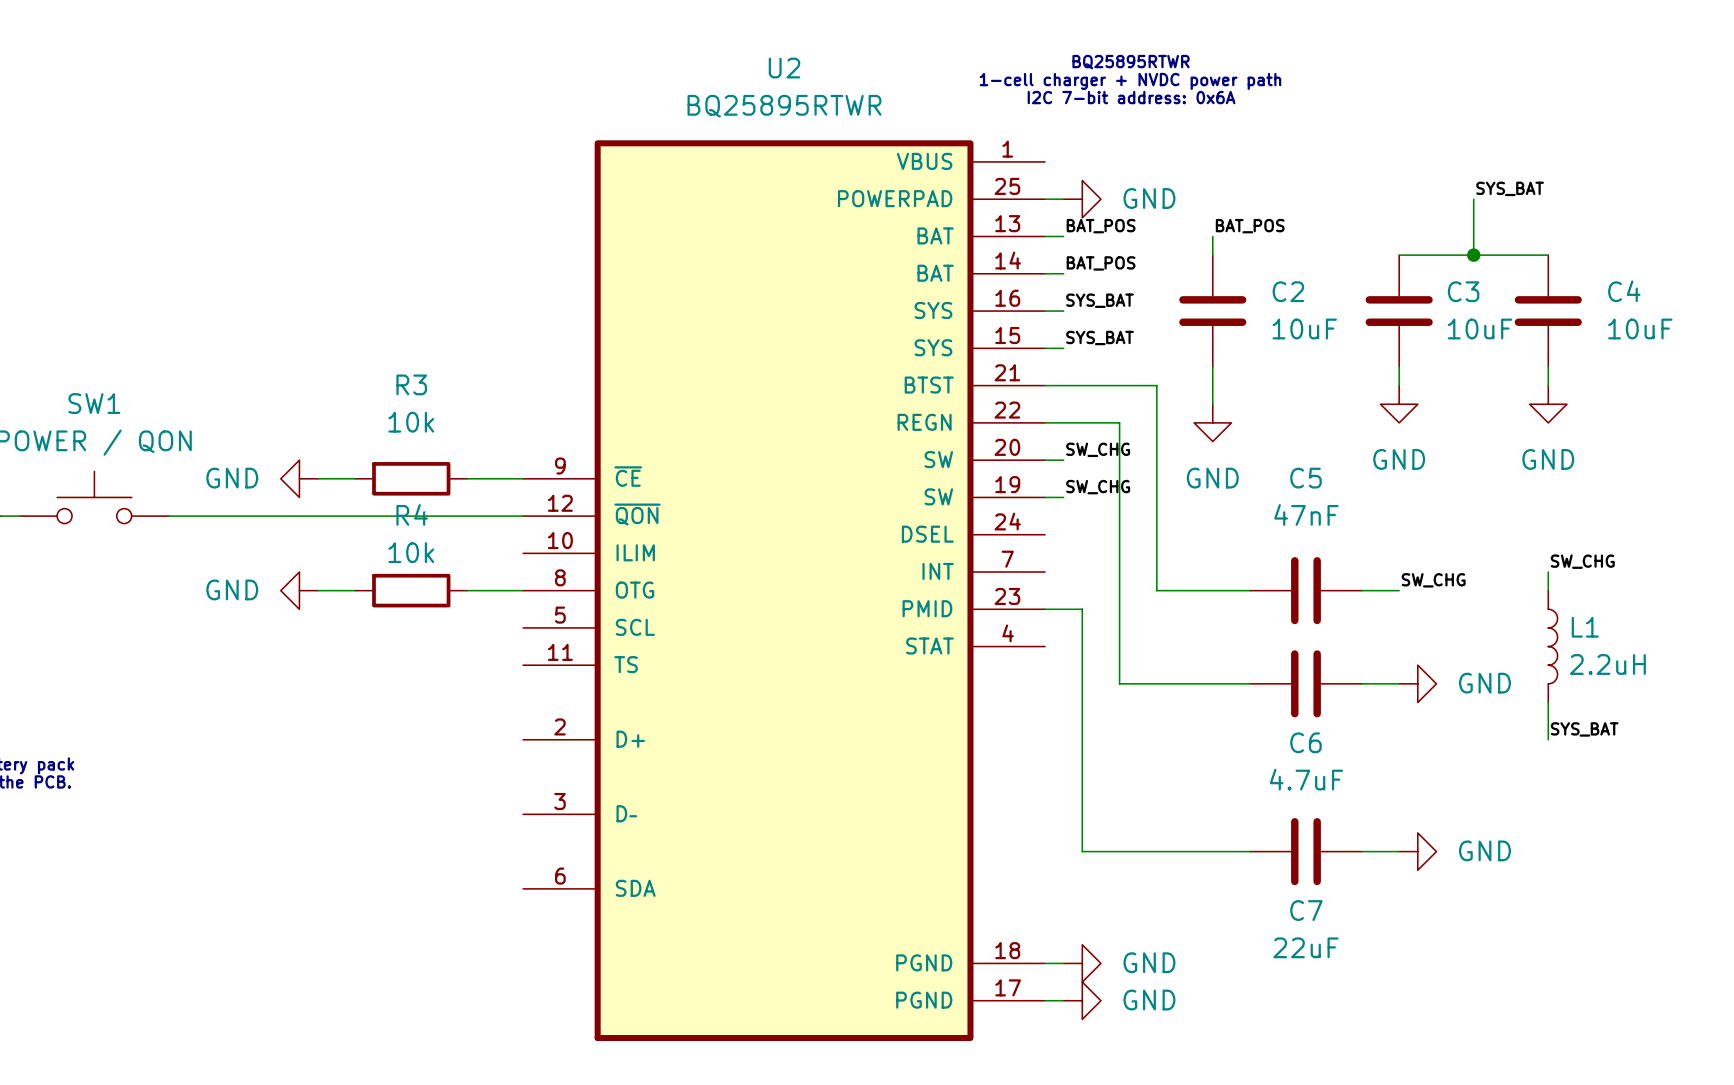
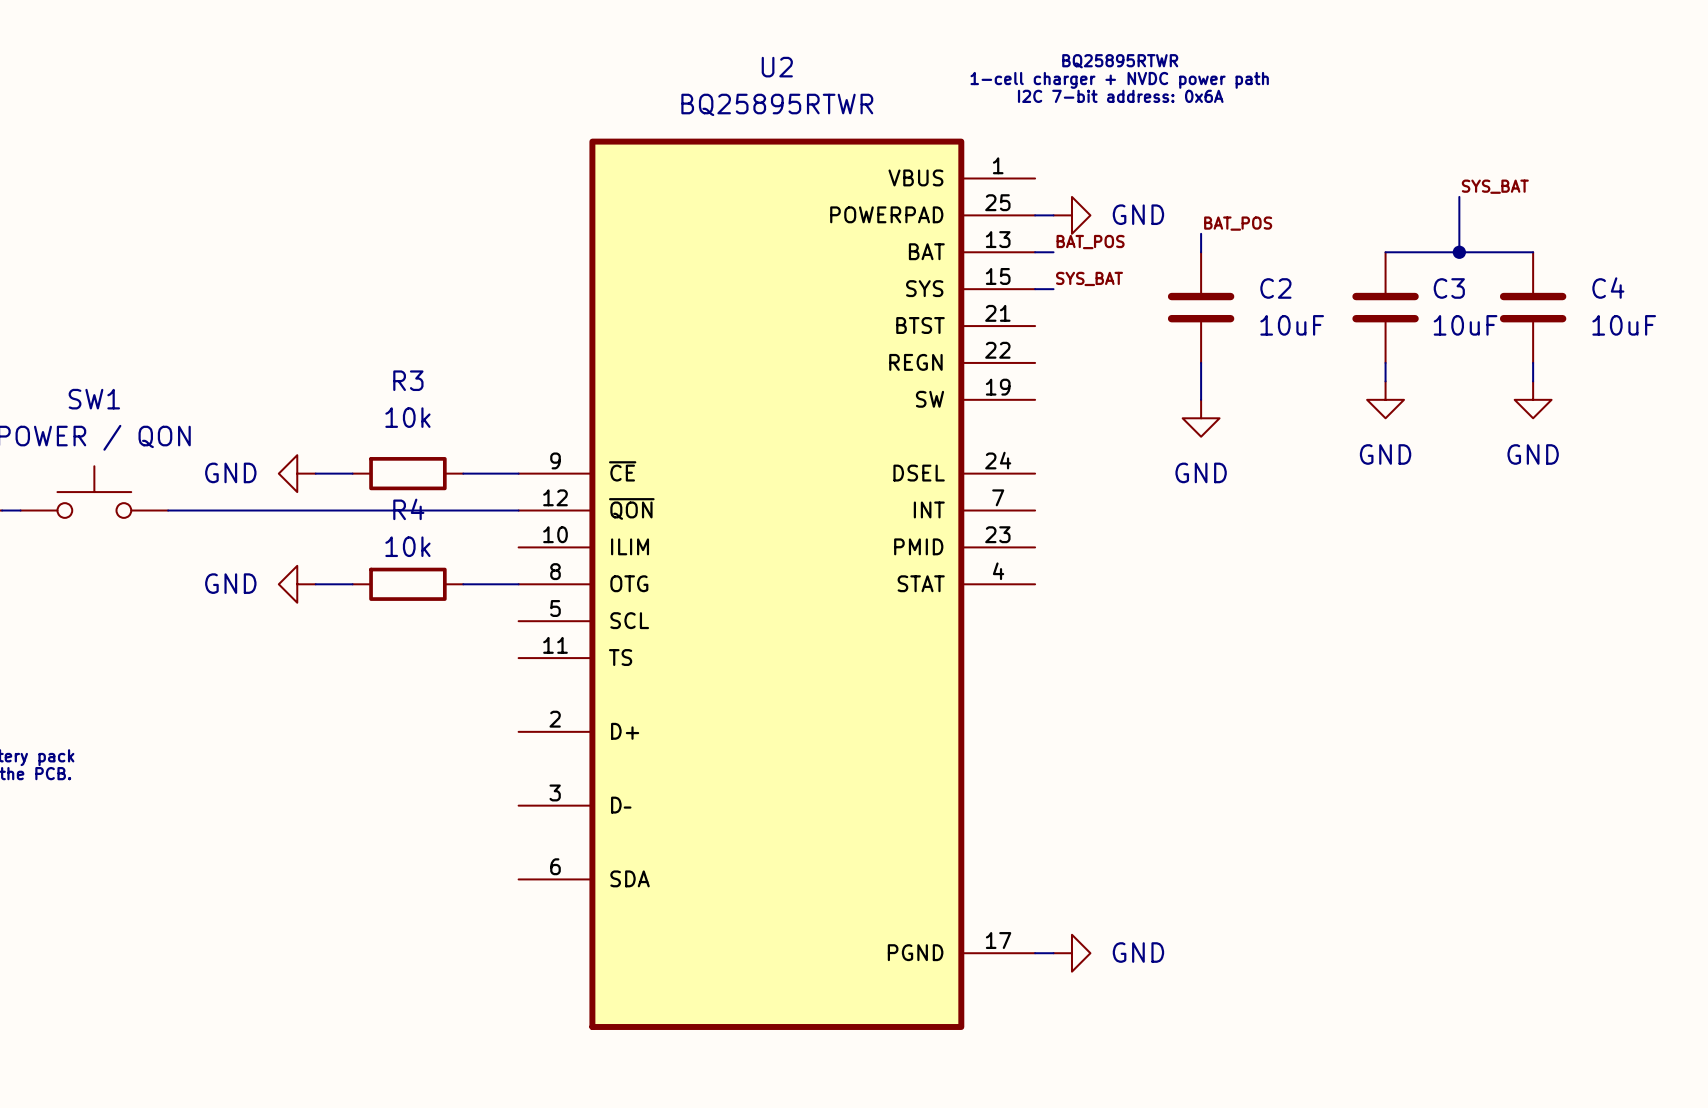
U2 symbol: [523, 140, 1046, 1042] -> [518, 138, 1036, 1030]
wire: (1045, 199) (1063, 199) -> (1035, 215) (1053, 215)
power symbol position: GND (1082, 199) -> GND (1071, 215)
label: BAT_POS (1101, 226) -> none
wire: (1045, 236) (1063, 236) -> (1035, 252) (1053, 252)
label: none -> BAT_POS (1090, 242)
label: BAT_POS (1101, 263) -> none
wire: (1045, 273) (1063, 273) -> (1035, 289) (1053, 289)
label position: SYS_BAT (1100, 300) -> SYS_BAT (1089, 278)
wire: (1045, 311) (1063, 311) -> none
label: SYS_BAT (1100, 337) -> none
wire: (1045, 348) (1063, 348) -> none
wire: (1045, 385) (1156, 385) (1156, 590) (1250, 590) -> none
wire: (1045, 422) (1119, 422) (1119, 683) (1250, 683) -> none
label: SW_CHG (1098, 449) -> none
wire: (1045, 460) (1063, 460) -> none
label: SW_CHG (1098, 487) -> none
wire: (1045, 497) (1063, 497) -> none
label: SW_CHG (1582, 561) -> none
wire: (1548, 572) (1548, 590) -> none
label: SW_CHG (1433, 580) -> none
C5: 47nF (1305, 590) -> none
wire: (1361, 590) (1399, 590) -> none
wire: (1045, 609) (1082, 609) (1082, 851) (1250, 851) -> none
L1: 2.2uH (1552, 646) -> none
C6: 4.7uF (1305, 683) -> none
wire: (1361, 683) (1399, 683) -> none
power symbol: GND (1417, 683) -> none
wire: (1548, 702) (1548, 739) -> none
label: SYS_BAT (1584, 729) -> none
C7: 22uF (1305, 851) -> none
wire: (1361, 851) (1399, 851) -> none
power symbol: GND (1417, 851) -> none
wire: (1045, 1000) (1063, 1000) -> none
power symbol: GND (1082, 1000) -> none

